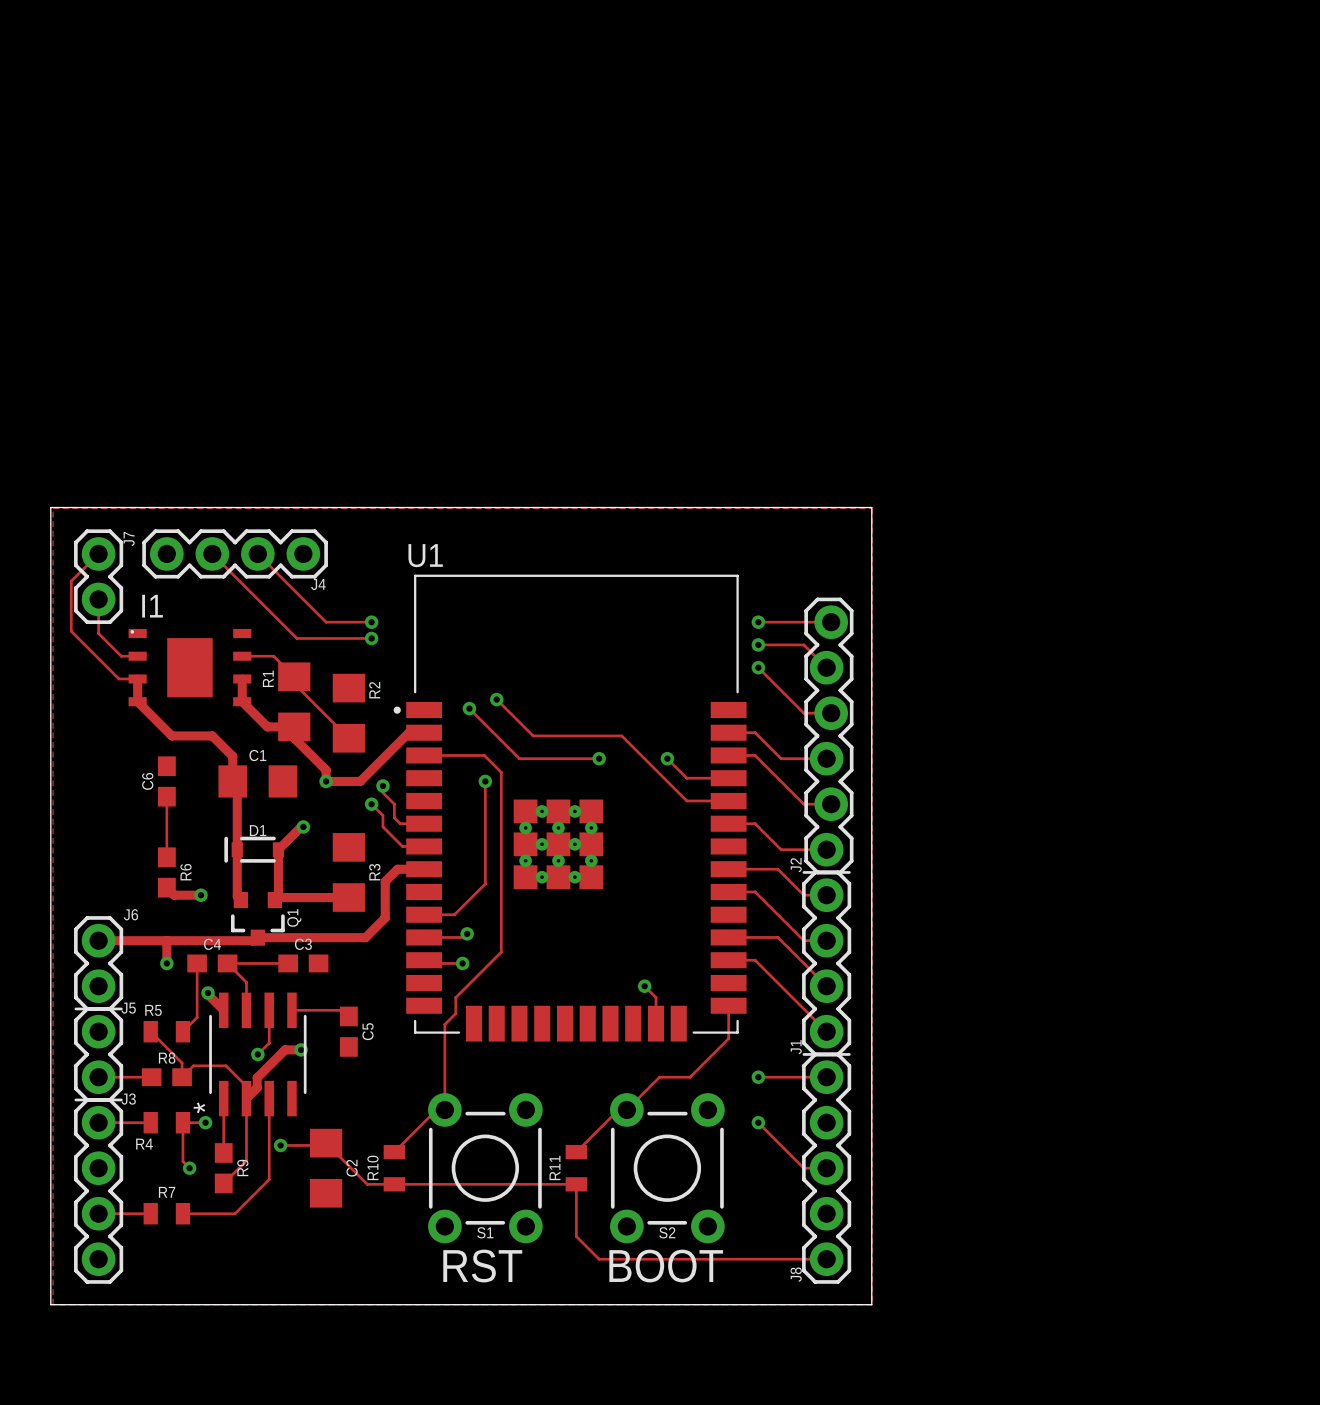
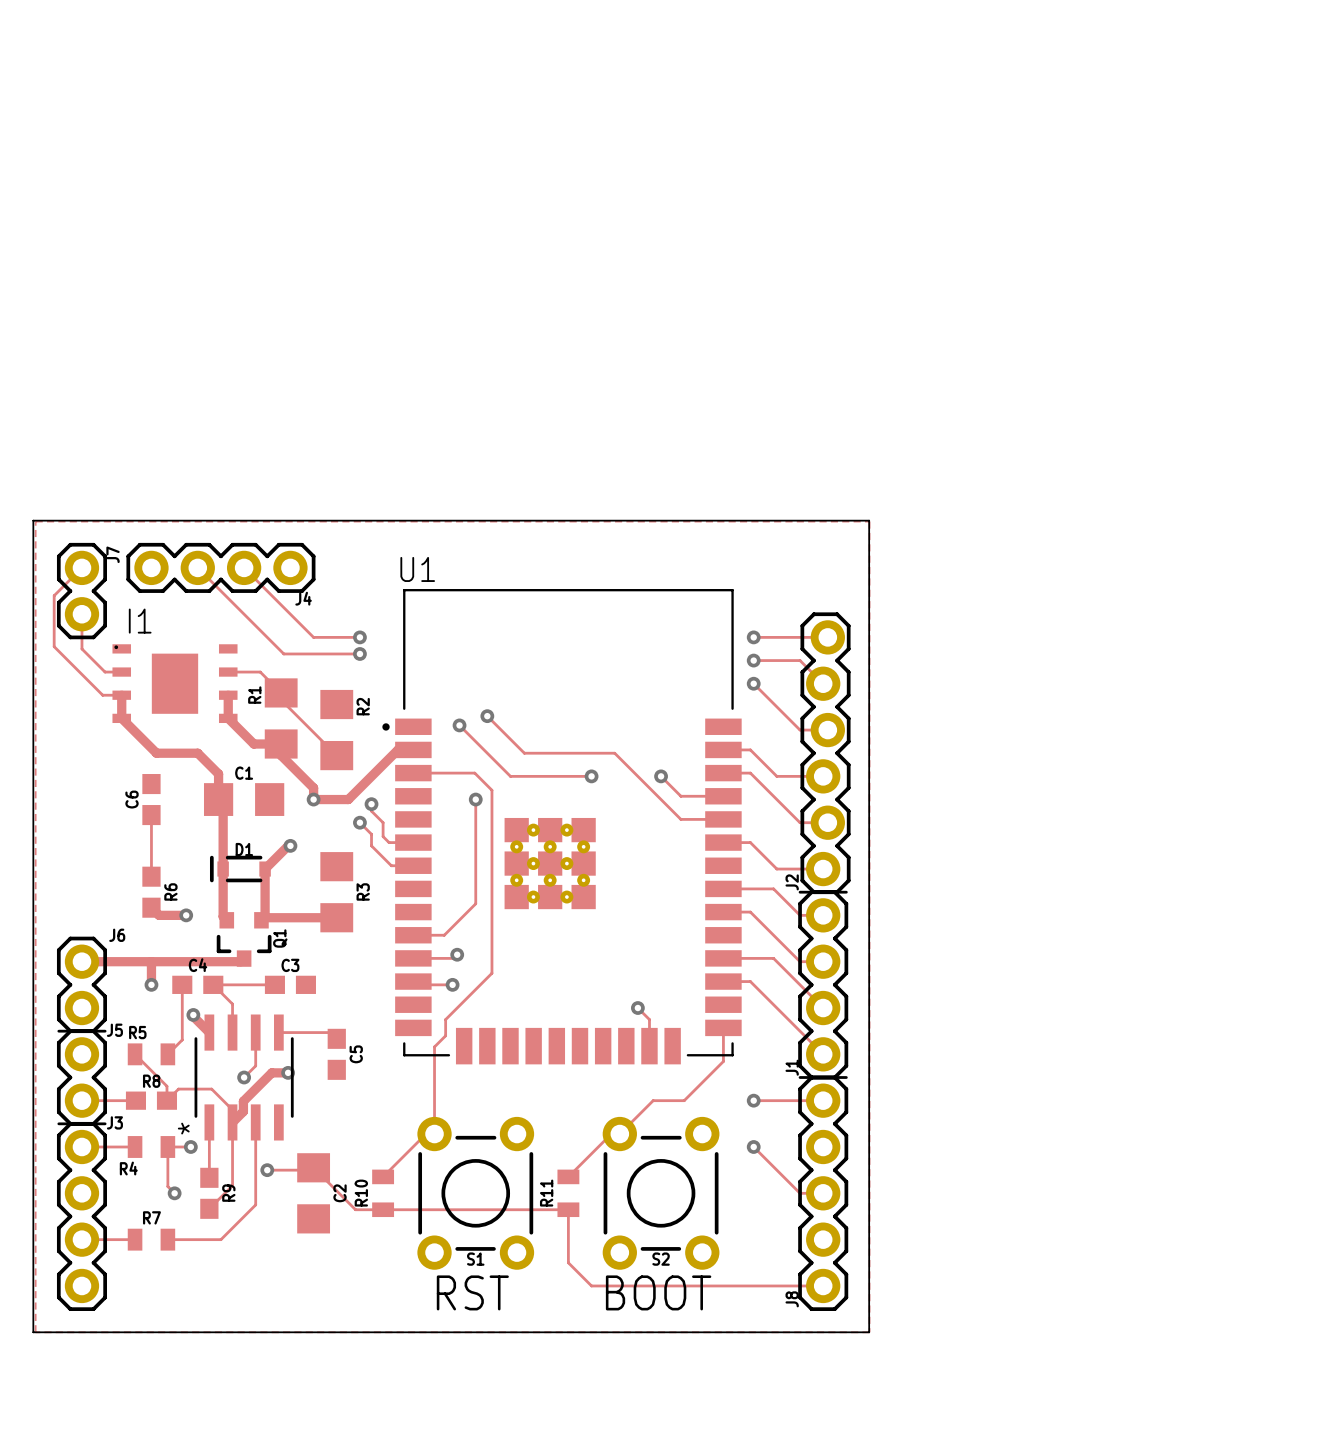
track: (424, 869) (397, 869) (385, 881) (385, 917) (365, 937) (257, 937) -> none

